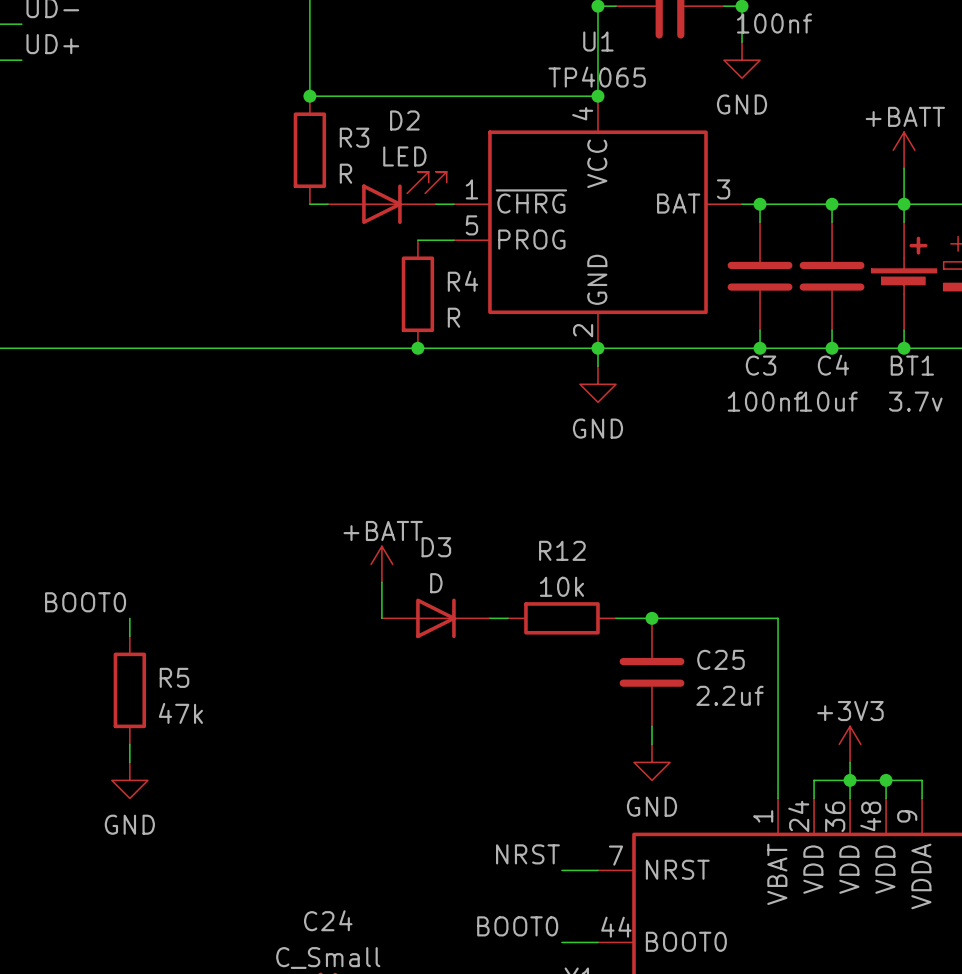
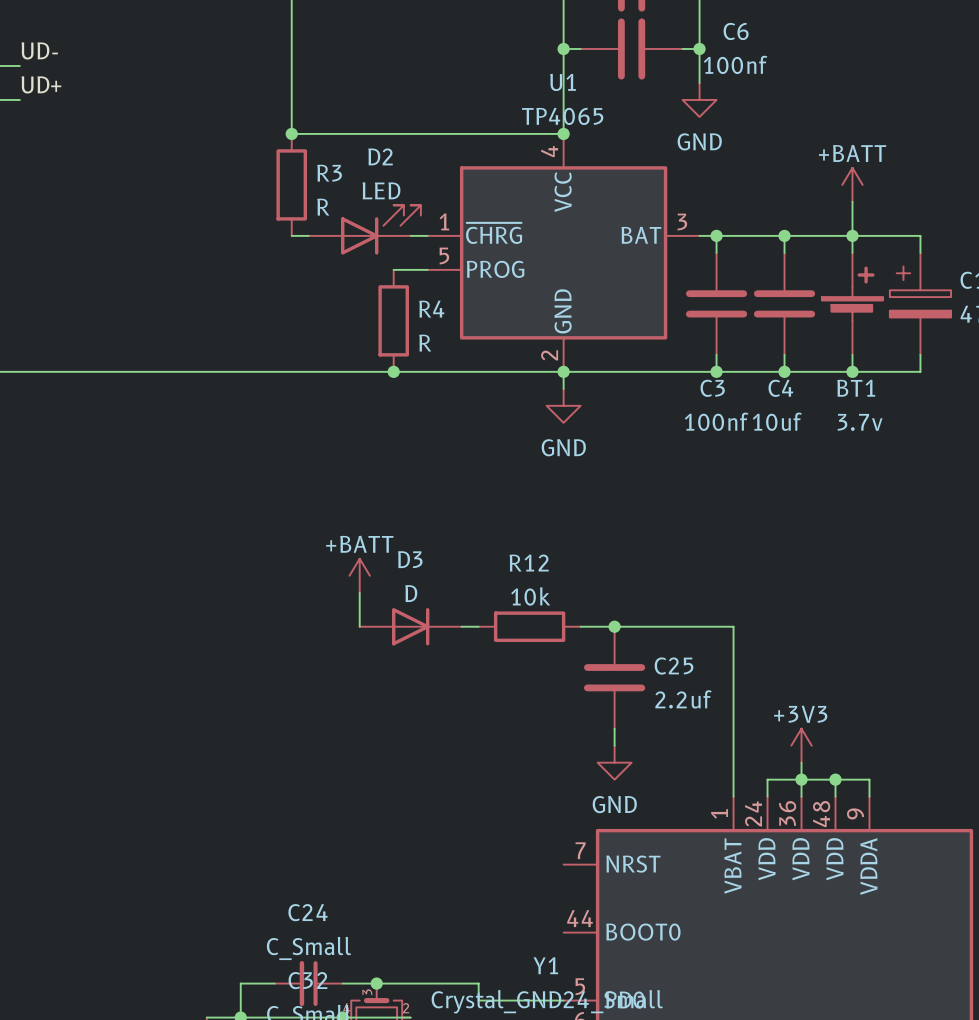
label: BOOT0 (85, 602) -> none
wire: (129, 618) (129, 636) -> none
R5: 47k (129, 690) -> none
wire: (129, 744) (129, 762) -> none
power symbol: GND (129, 780) -> none
label: NRST (527, 854) -> none
wire: (561, 870) (597, 870) -> none
label: BOOT0 (517, 926) -> none
wire: (561, 942) (597, 942) -> none

